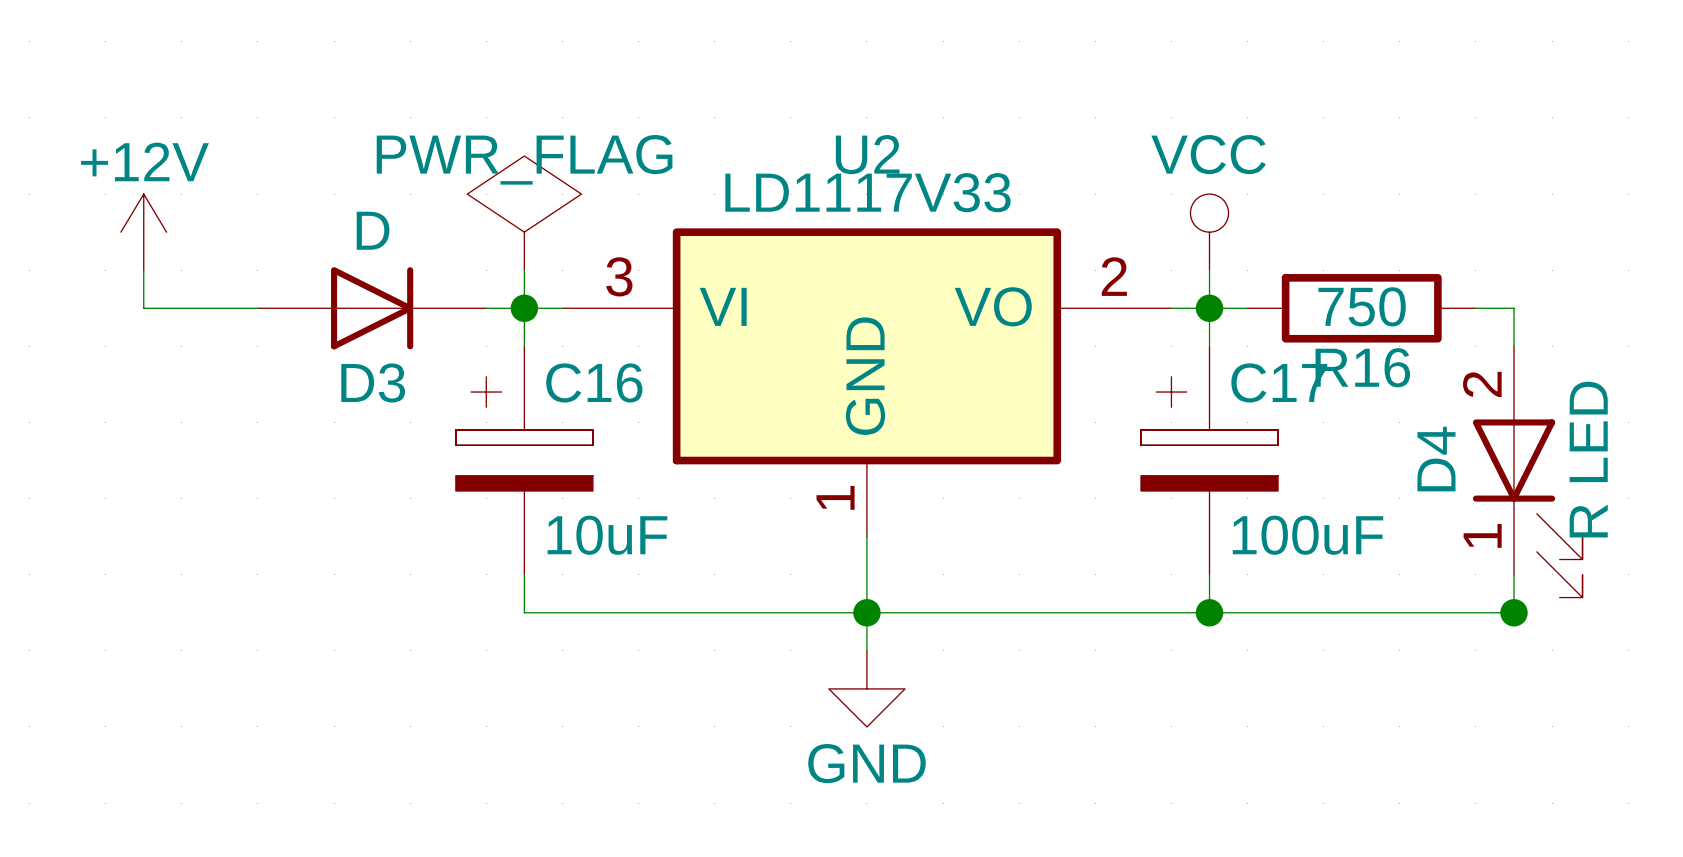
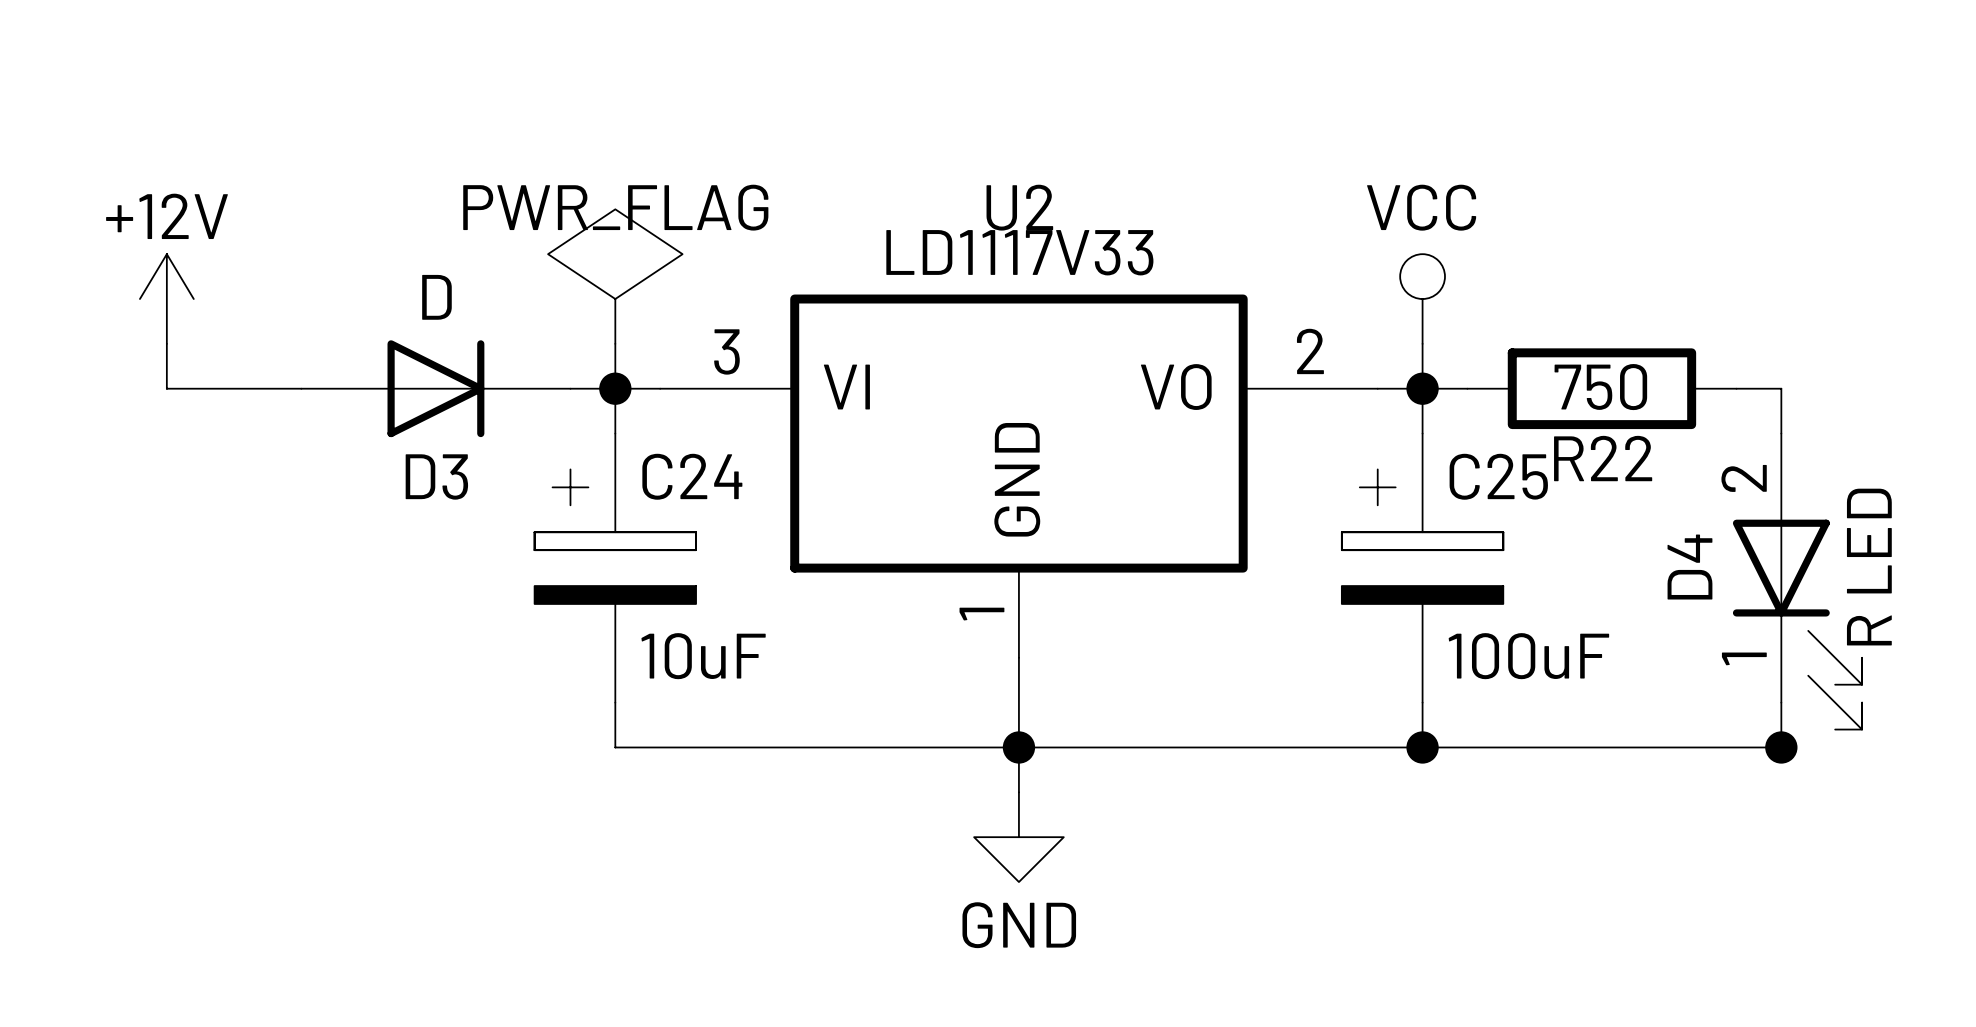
R16 name: R16 (1362, 367) -> R22 (1603, 458)
C16 name: C16 (594, 382) -> C24 (692, 476)
C17 name: C17 (1279, 382) -> C25 (1498, 476)

